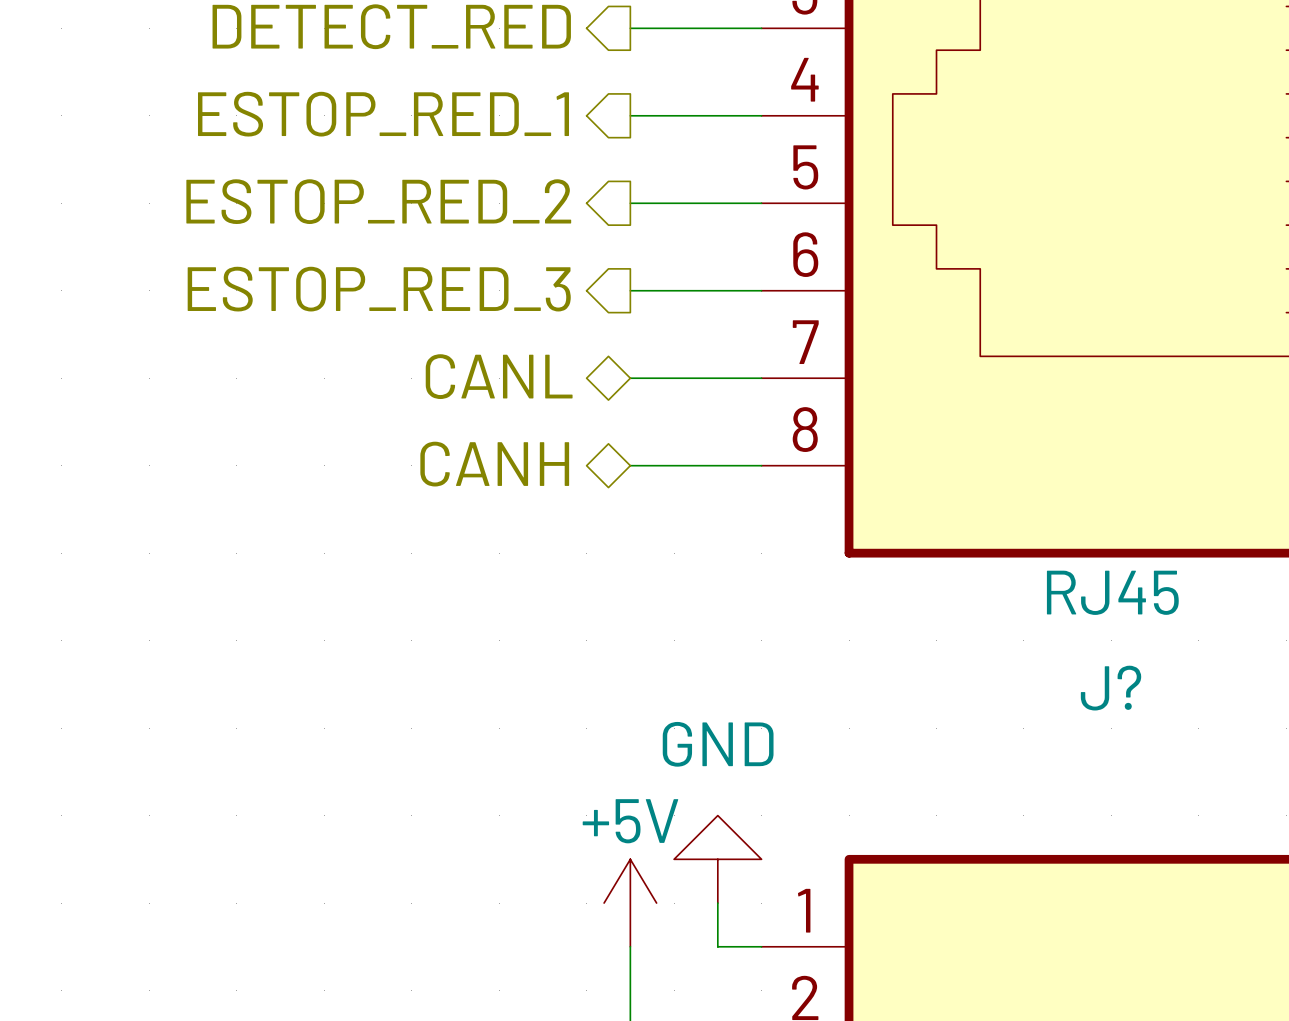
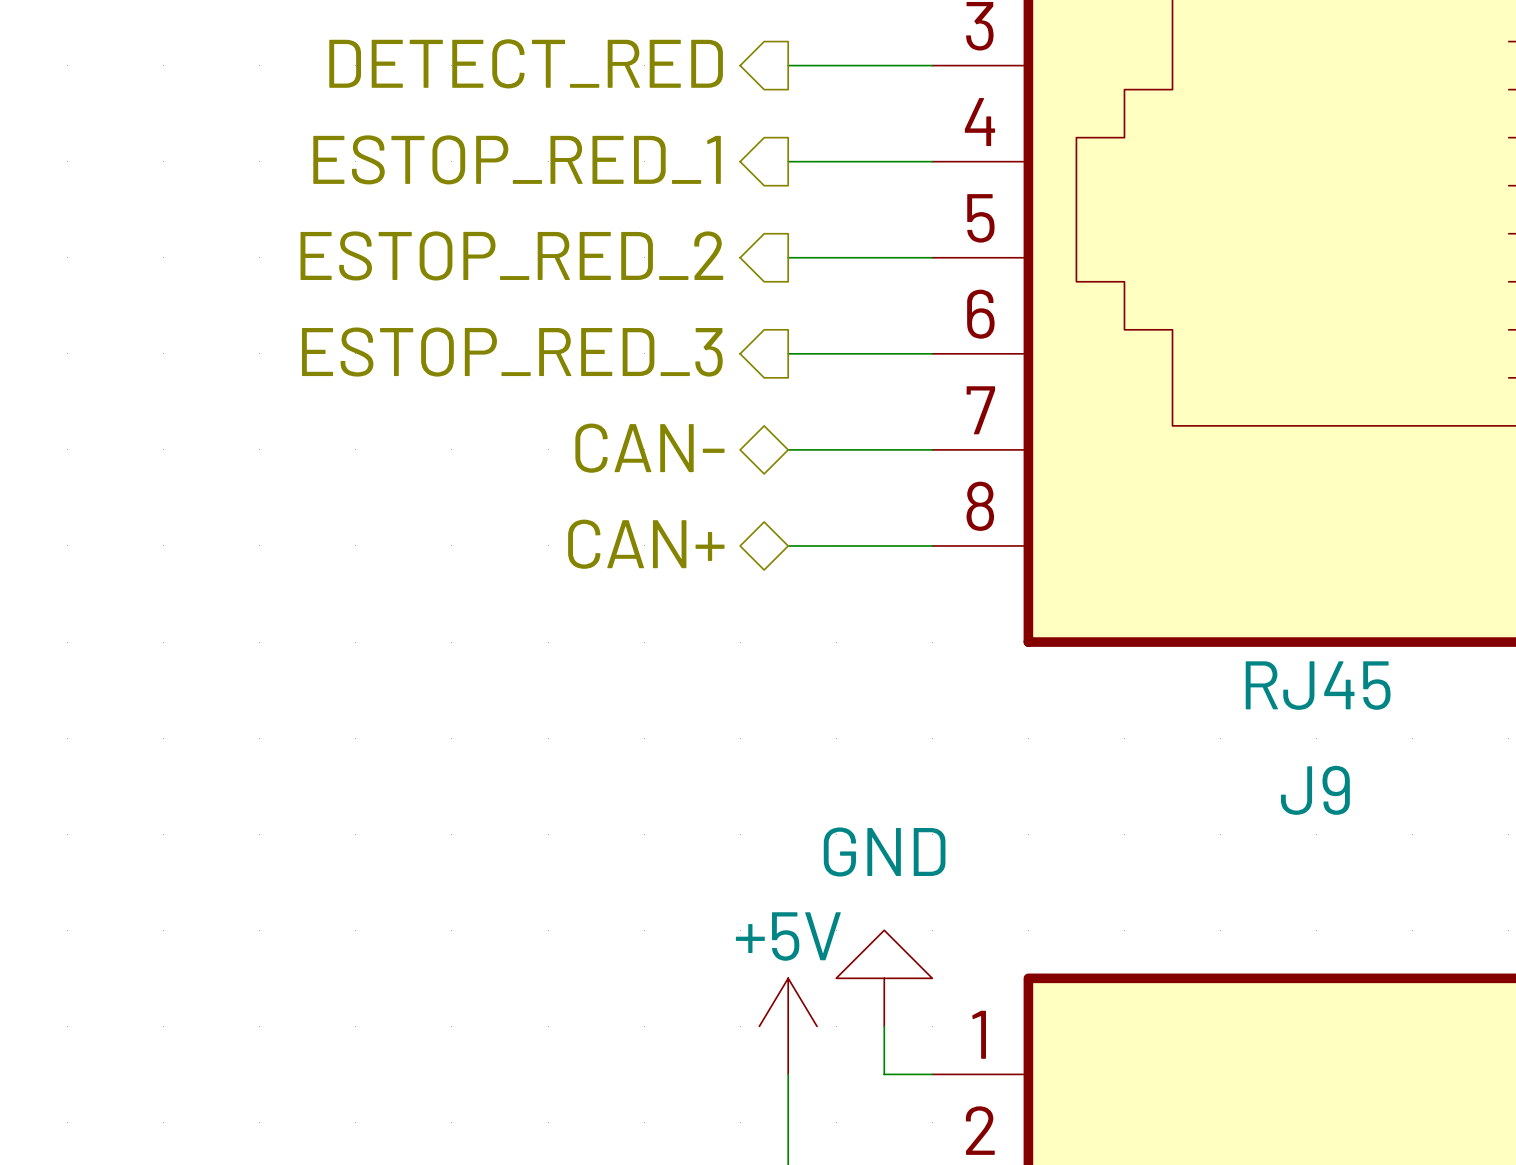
hierarchical label: CANL (499, 376) -> CAN- (649, 448)
hierarchical label: CANH (494, 464) -> CAN+ (646, 544)
J? name: J? (1111, 688) -> J9 (1315, 790)

